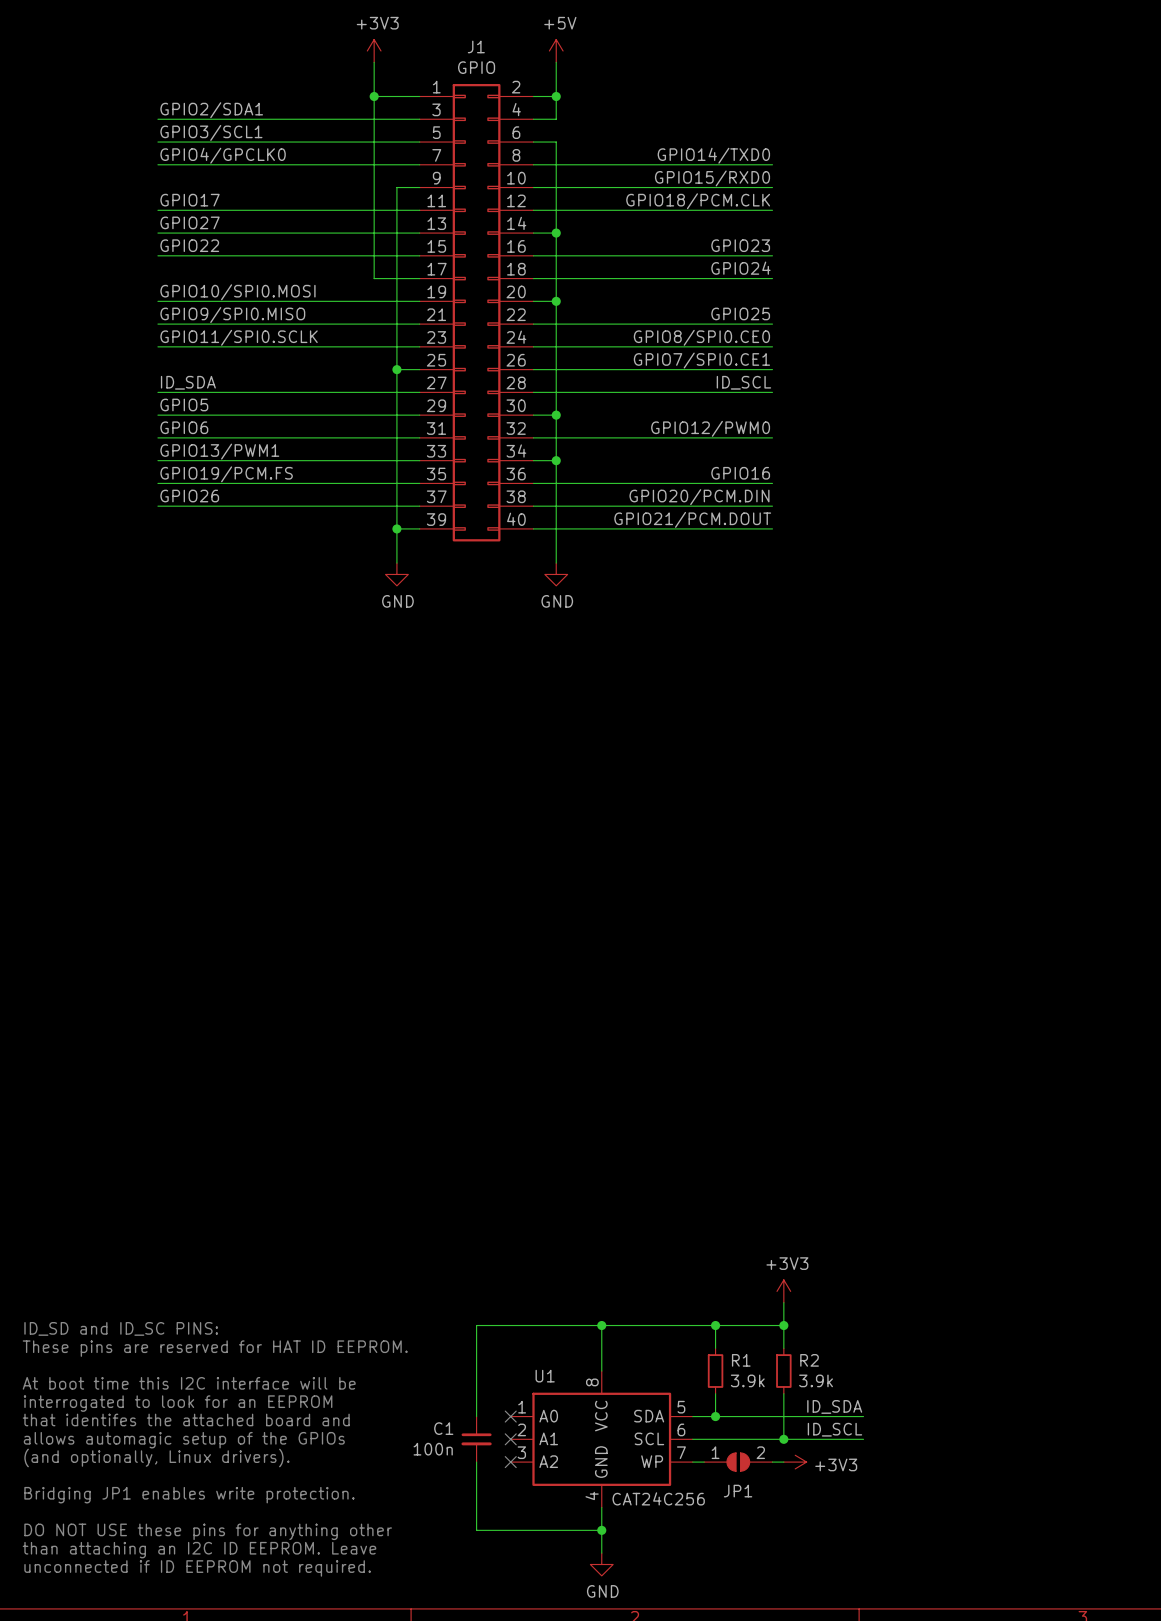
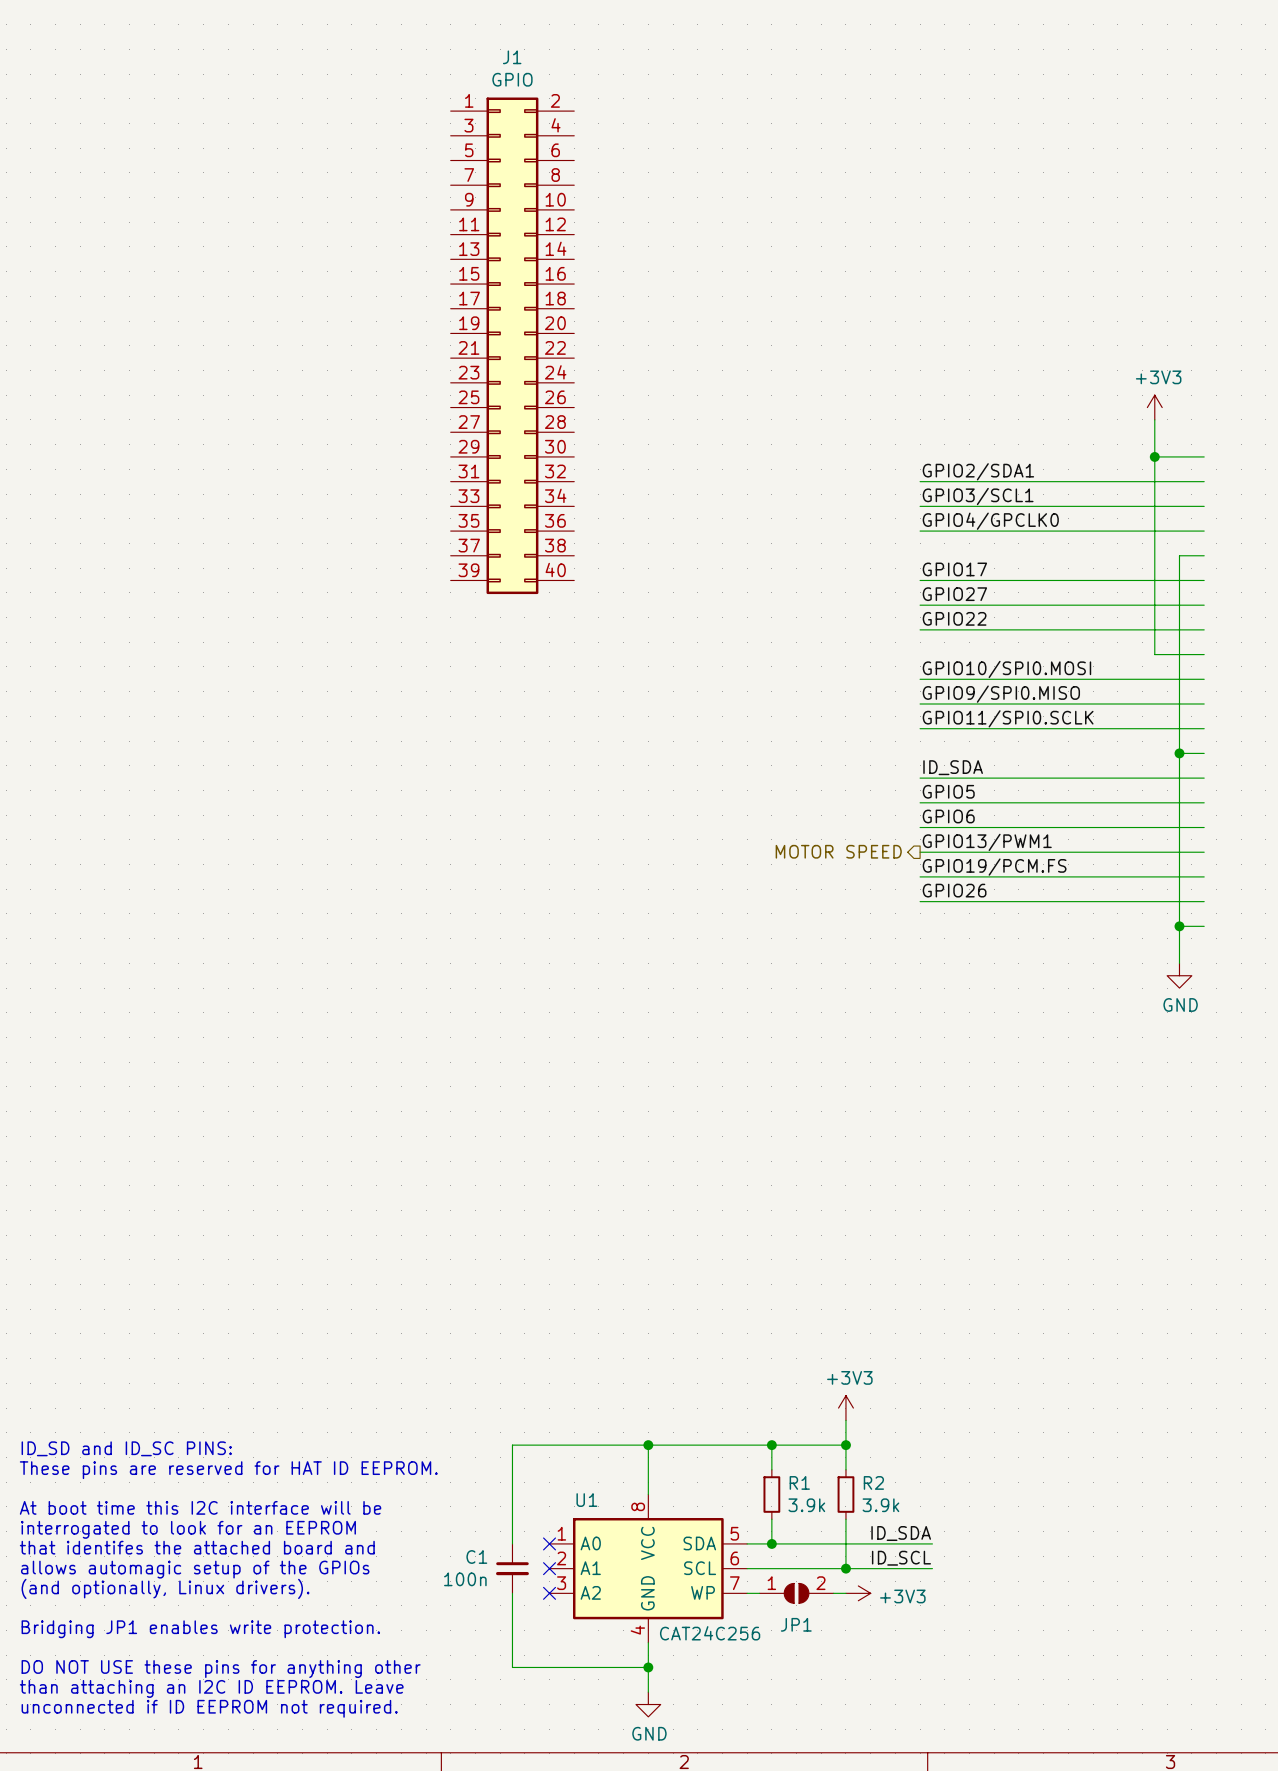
power symbol: +3V3 (374, 50) -> none
power symbol: +5V (556, 50) -> none
wire: (374, 62) (374, 278) (419, 278) -> none
wire: (556, 62) (556, 119) (533, 119) -> none
wire: (374, 96) (419, 96) -> none
junction: (374, 96) -> none
wire: (533, 96) (556, 96) -> none
junction: (556, 96) -> none
label: GPIO2/SDA1 (211, 110) -> none
wire: (157, 119) (419, 119) -> none
label: GPIO3/SCL1 (211, 132) -> none
wire: (157, 142) (419, 142) -> none
wire: (533, 142) (556, 142) (556, 563) -> none
label: GPIO4/GPCLK0 (223, 155) -> none
label: GPIO14/TXD0 (713, 155) -> none
wire: (157, 164) (419, 164) -> none
wire: (533, 164) (772, 164) -> none
label: GPIO15/RXD0 (712, 178) -> none
wire: (419, 187) (396, 187) (396, 563) -> none
wire: (533, 187) (772, 187) -> none
label: GPIO17 (190, 200) -> none
label: GPIO18/PCM.CLK (698, 201) -> none
wire: (157, 210) (419, 210) -> none
wire: (533, 210) (772, 210) -> none
label: GPIO27 (190, 222) -> none
wire: (157, 233) (419, 233) -> none
wire: (533, 233) (556, 233) -> none
junction: (556, 233) -> none
label: GPIO22 (189, 245) -> none
label: GPIO23 (740, 245) -> none
wire: (157, 255) (419, 255) -> none
wire: (533, 255) (772, 255) -> none
label: GPIO24 (740, 268) -> none
wire: (533, 278) (772, 278) -> none
label: GPIO10/SPI0.MOSI (237, 292) -> none
wire: (157, 301) (419, 301) -> none
wire: (533, 301) (556, 301) -> none
junction: (556, 301) -> none
label: GPIO25 (740, 313) -> none
label: GPIO9/SPI0.MISO (232, 315) -> none
wire: (157, 324) (419, 324) -> none
wire: (533, 324) (772, 324) -> none
label: GPIO11/SPI0.SCLK (239, 337) -> none
label: GPIO8/SPI0.CE0 (701, 337) -> none
wire: (157, 346) (419, 346) -> none
wire: (533, 346) (772, 346) -> none
label: GPIO7/SPI0.CE1 (701, 360) -> none
wire: (396, 369) (419, 369) -> none
junction: (396, 369) -> none
wire: (533, 369) (772, 369) -> none
power symbol: none -> +3V3 (1154, 407)
wire: none -> (1154, 419) (1154, 654) (1204, 654)
label: ID_SDA (188, 382) -> none
label: ID_SCL (743, 382) -> none
wire: (157, 392) (419, 392) -> none
wire: (533, 392) (772, 392) -> none
label: GPIO5 (184, 404) -> none
wire: (157, 415) (419, 415) -> none
wire: (533, 415) (556, 415) -> none
junction: (556, 415) -> none
wire: none -> (1154, 456) (1204, 456)
junction: none -> (1154, 456)
label: GPIO6 (184, 427) -> none
label: GPIO12/PWM0 (710, 428) -> none
label: none -> GPIO2/SDA1 (978, 471)
wire: (157, 437) (419, 437) -> none
wire: (533, 437) (772, 437) -> none
wire: none -> (920, 481) (1204, 481)
label: GPIO13/PWM1 (219, 451) -> none
label: none -> GPIO3/SCL1 (978, 496)
wire: (157, 460) (419, 460) -> none
wire: (533, 460) (556, 460) -> none
junction: (556, 460) -> none
wire: none -> (920, 506) (1204, 506)
label: GPIO16 (740, 473) -> none
label: GPIO19/PCM.FS (226, 474) -> none
label: none -> GPIO4/GPCLK0 (990, 521)
wire: (157, 483) (419, 483) -> none
wire: (533, 483) (772, 483) -> none
wire: none -> (920, 531) (1204, 531)
label: GPIO26 (189, 496) -> none
label: GPIO20/PCM.DIN (699, 497) -> none
wire: (157, 506) (419, 506) -> none
wire: (533, 506) (772, 506) -> none
wire: none -> (1204, 555) (1179, 555) (1179, 963)
label: none -> GPIO17 (954, 569)
label: GPIO21/PCM.DOUT (692, 519) -> none
wire: (396, 528) (419, 528) -> none
junction: (396, 528) -> none
wire: (533, 528) (772, 528) -> none
wire: none -> (920, 580) (1204, 580)
label: none -> GPIO27 (954, 594)
wire: none -> (920, 605) (1204, 605)
label: none -> GPIO22 (954, 618)
power symbol: GND (396, 574) -> none
power symbol: GND (556, 574) -> none
wire: none -> (920, 629) (1204, 629)
label: none -> GPIO10/SPI0.MOSI (1006, 669)
wire: none -> (920, 679) (1204, 679)
label: none -> GPIO9/SPI0.MISO (1001, 694)
wire: none -> (920, 703) (1204, 703)
label: none -> GPIO11/SPI0.SCLK (1008, 718)
wire: none -> (920, 728) (1204, 728)
wire: none -> (1179, 753) (1204, 753)
junction: none -> (1179, 753)
label: none -> ID_SDA (953, 767)
wire: none -> (920, 778) (1204, 778)
label: none -> GPIO5 (948, 791)
wire: none -> (920, 802) (1204, 802)
label: none -> GPIO6 (948, 816)
wire: none -> (920, 827) (1204, 827)
label: none -> GPIO13/PWM1 (987, 842)
hierarchical label: none -> MOTOR SPEED (838, 851)
wire: none -> (920, 852) (1204, 852)
label: none -> GPIO19/PCM.FS (994, 867)
wire: none -> (920, 876) (1204, 876)
label: none -> GPIO26 (954, 890)
wire: none -> (920, 901) (1204, 901)
wire: none -> (1179, 926) (1204, 926)
junction: none -> (1179, 926)
power symbol: none -> GND (1179, 975)

